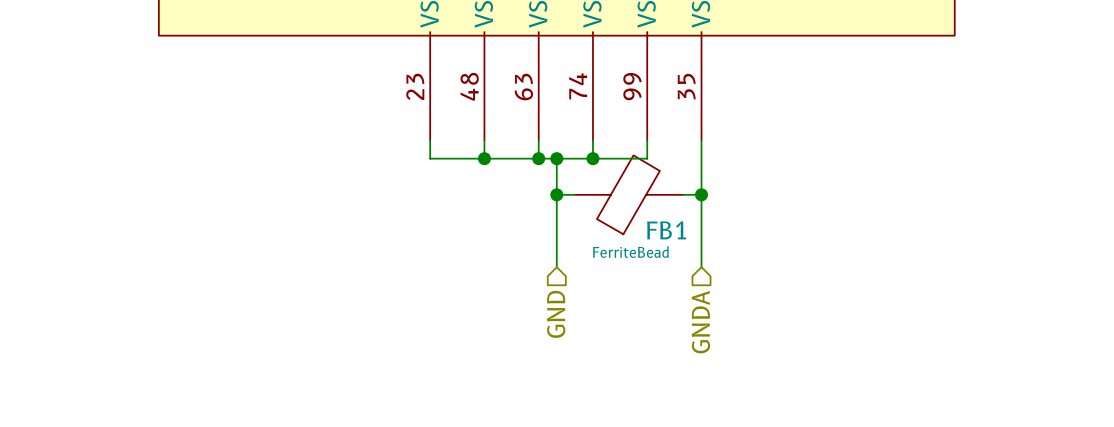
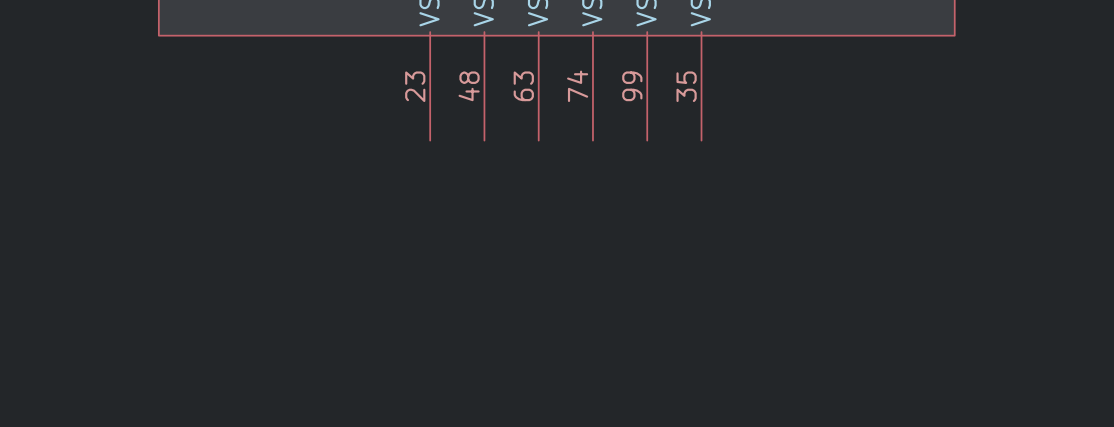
wire: (430, 140) (430, 158) (647, 158) (647, 140) -> none
wire: (484, 140) (484, 158) -> none
wire: (538, 140) (538, 158) -> none
wire: (592, 140) (592, 158) -> none
wire: (701, 140) (701, 267) -> none
junction: (484, 158) -> none
junction: (538, 158) -> none
wire: (556, 158) (556, 267) -> none
junction: (556, 158) -> none
junction: (592, 158) -> none
wire: (556, 194) (574, 194) -> none
junction: (556, 194) -> none
FB1: FerriteBead (629, 194) -> none
wire: (683, 194) (701, 194) -> none
junction: (701, 194) -> none
hierarchical label: GND (556, 314) -> none
hierarchical label: GNDA (700, 322) -> none

